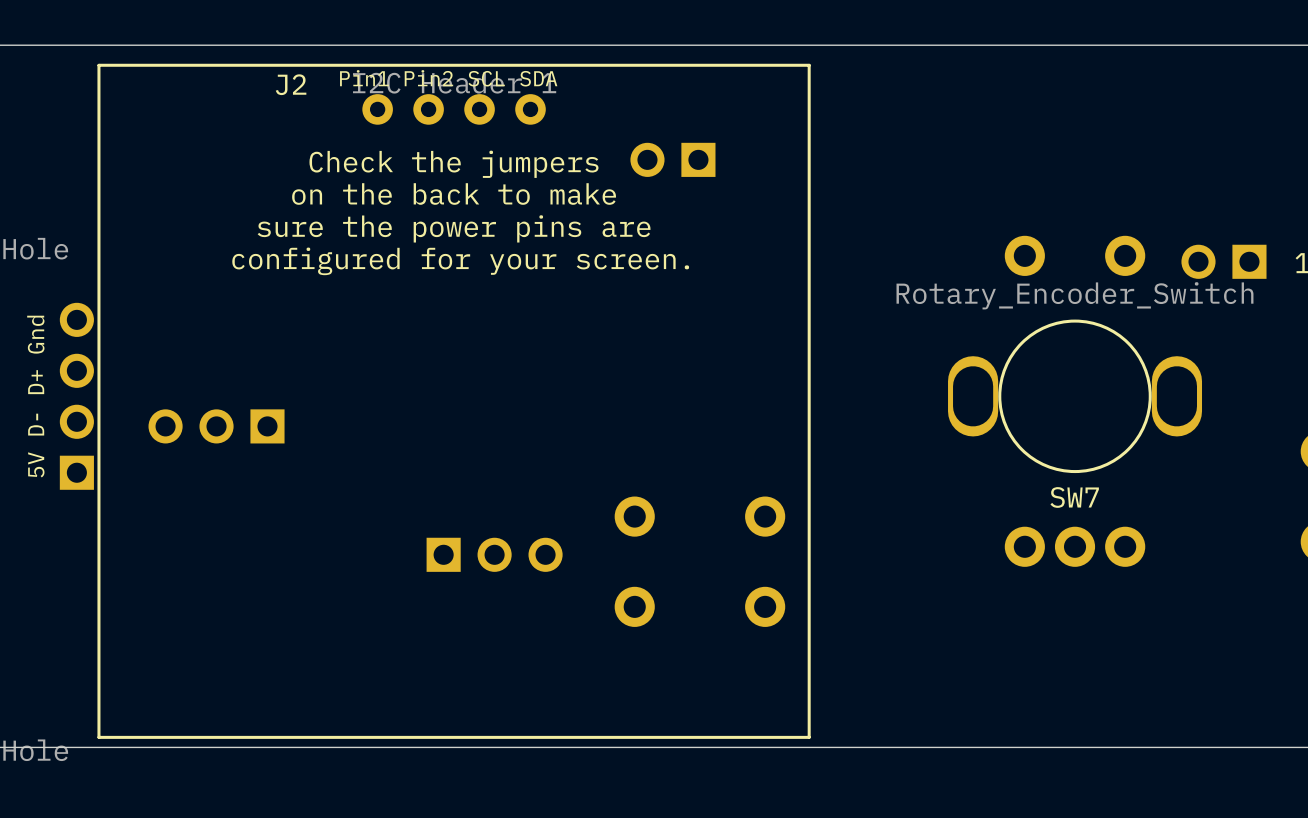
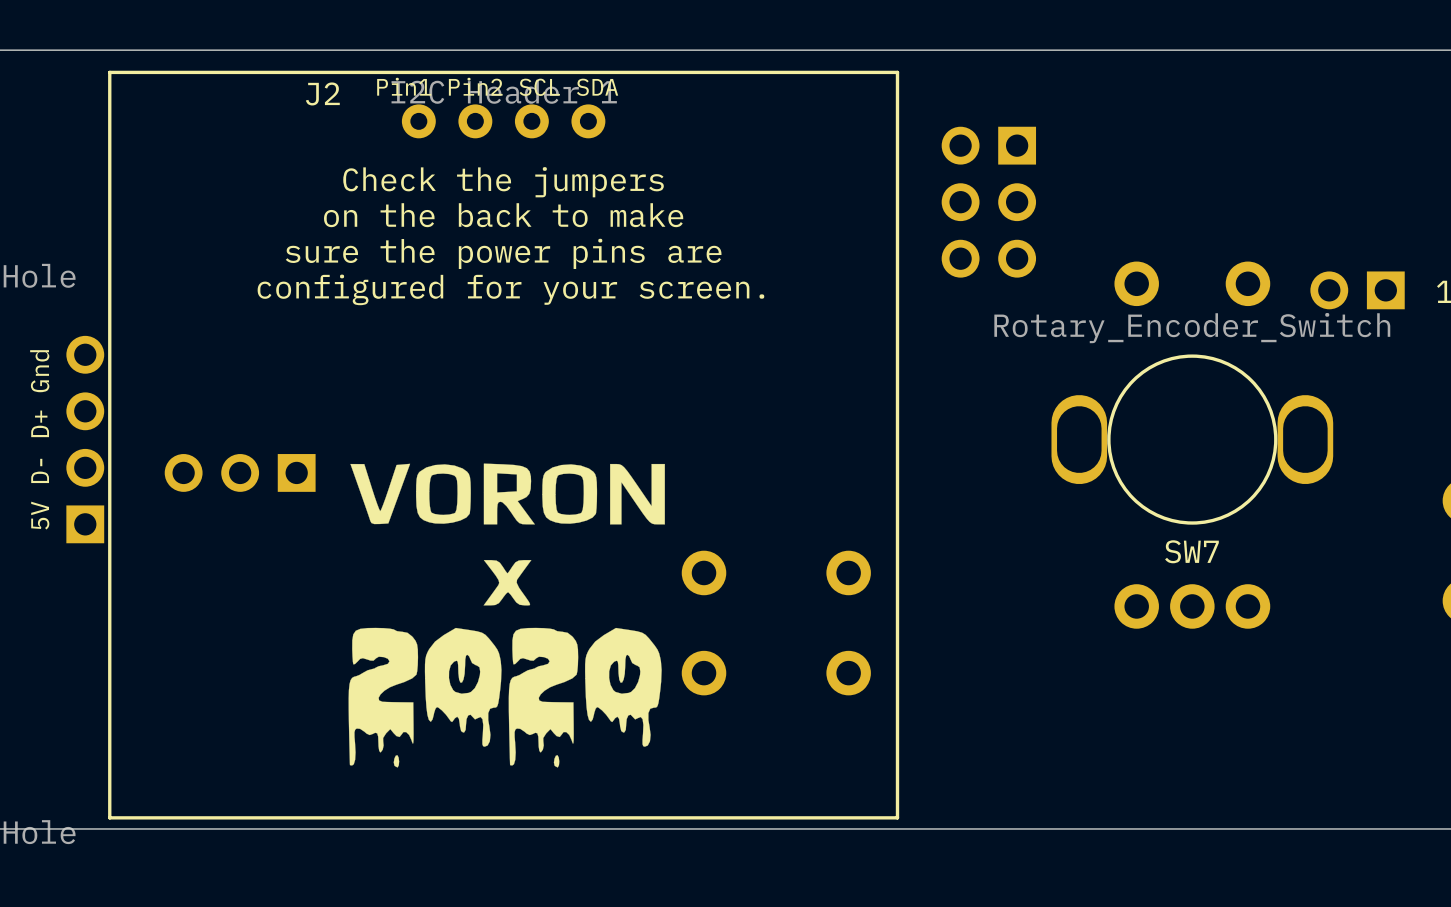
part: (672, 159) -> none
part: none -> (988, 202)
drawing: none -> [348, 463, 665, 768]
part: (494, 554) -> none

